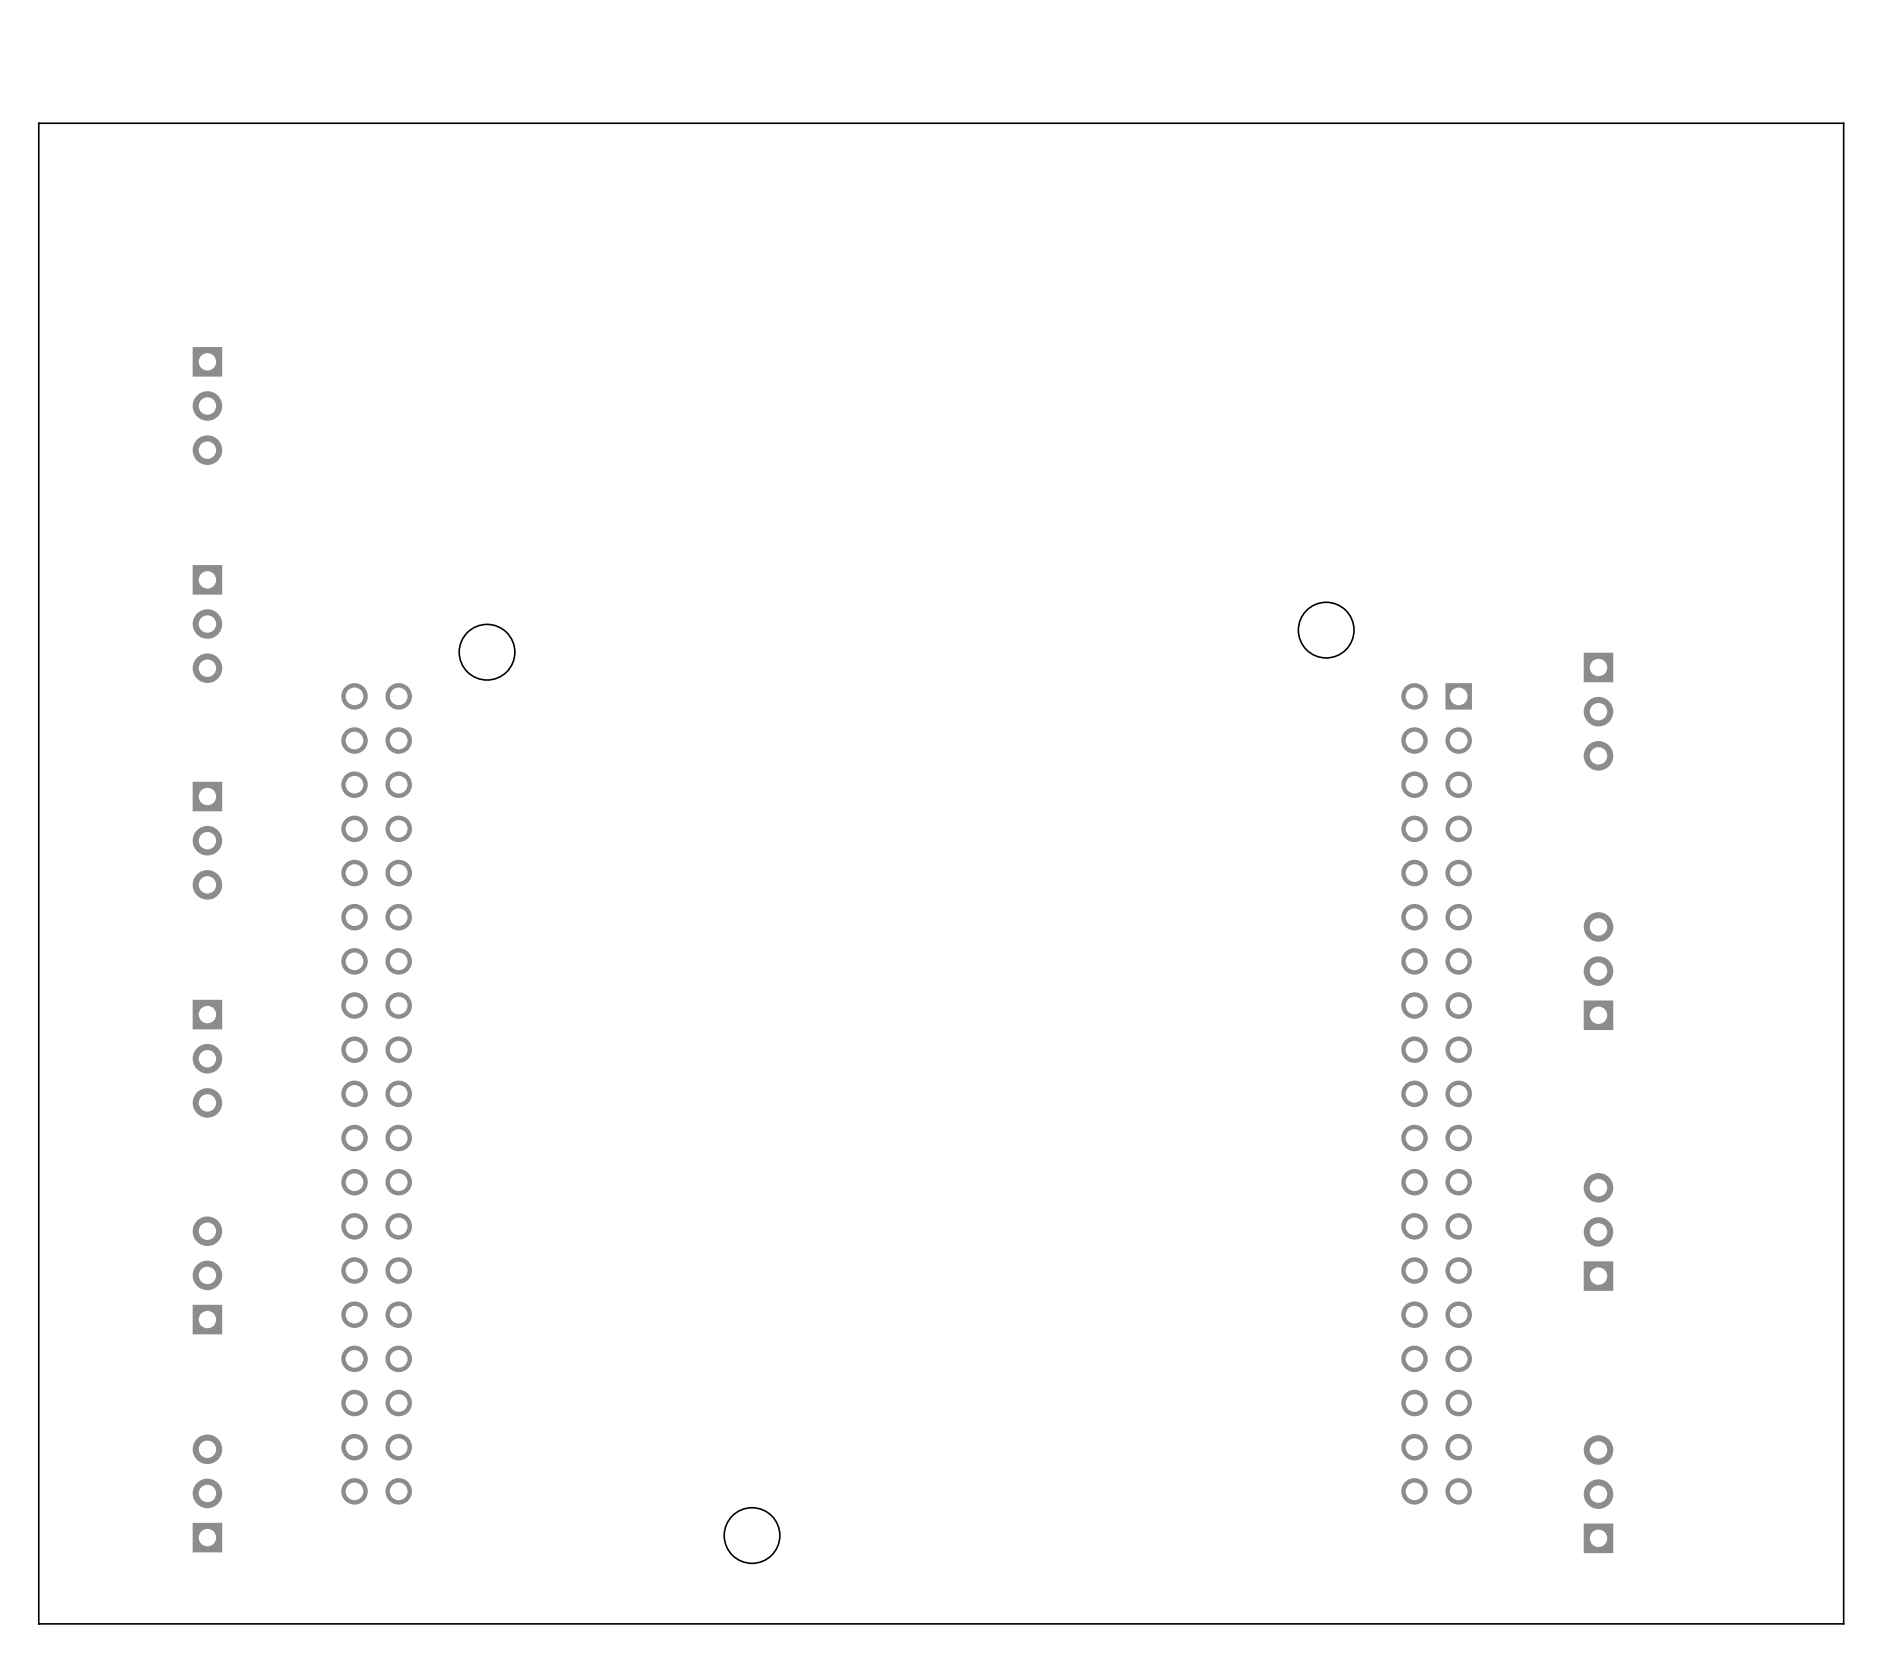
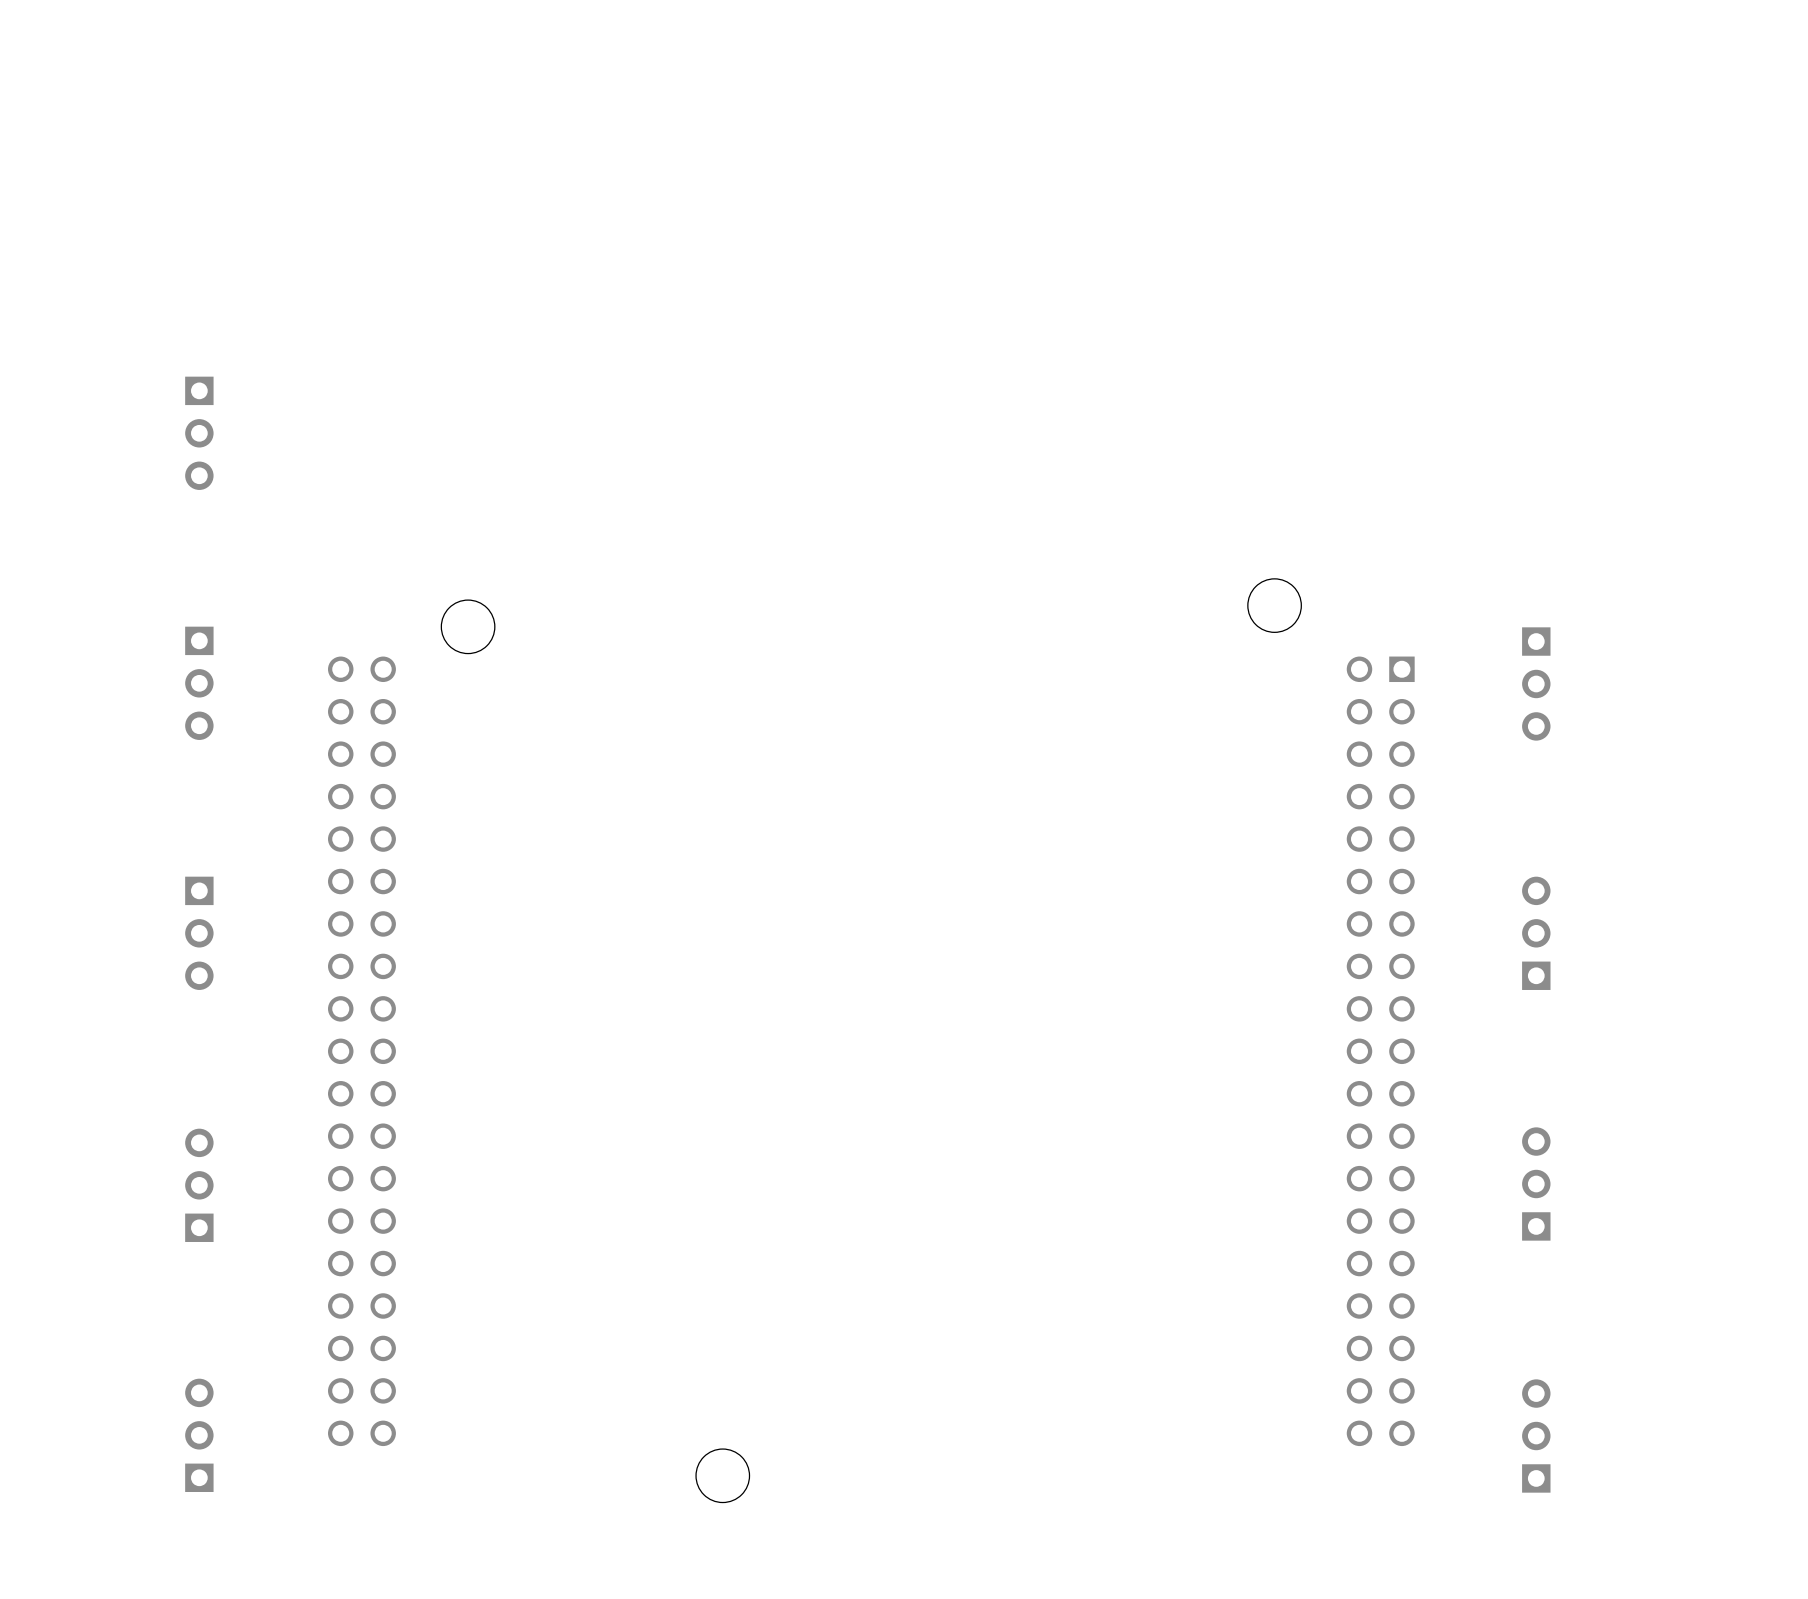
board edge: (1843, 123) (38, 123) (38, 1623) (1843, 1623) (1843, 123) -> none
part position: (207, 405) -> (199, 433)
part: (207, 624) -> none
part: none -> (199, 683)
part: (207, 840) -> none
part: none -> (199, 933)
part: (207, 1058) -> none
part position: (207, 1275) -> (199, 1185)

